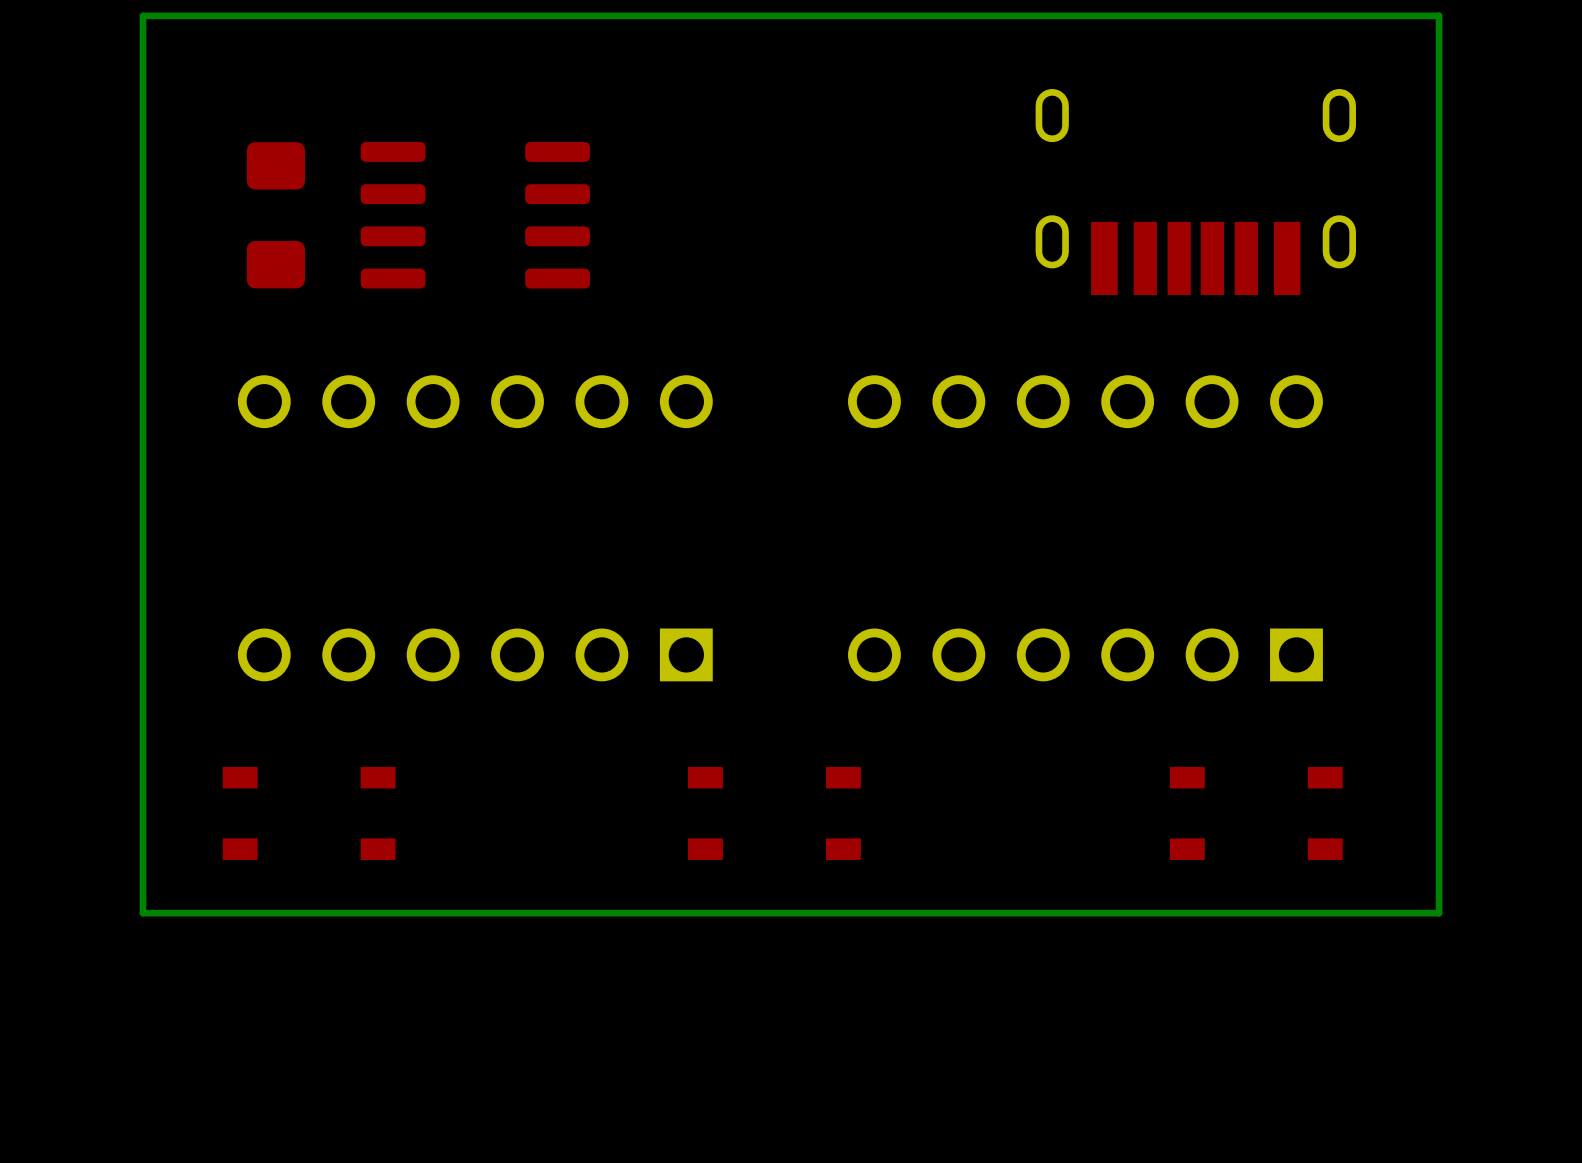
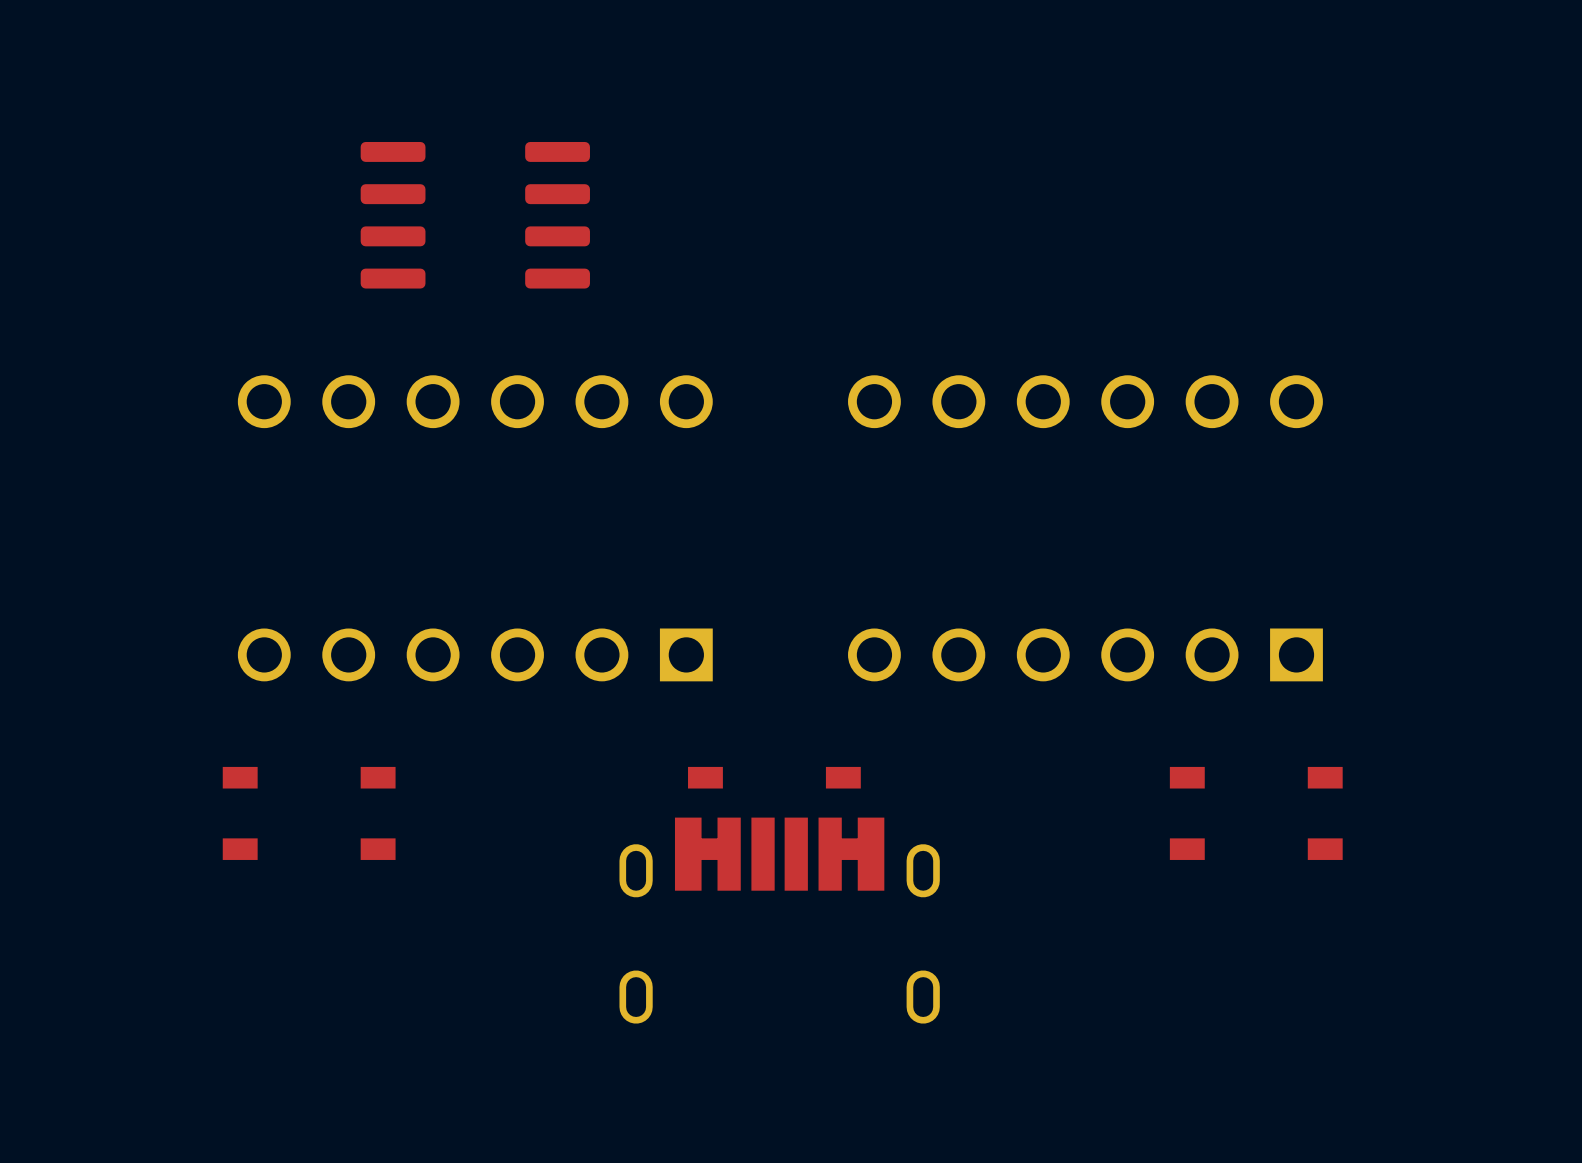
bottom track: (1439, 15) (143, 15) (143, 913) (1439, 913) (1439, 15) -> none
part: (1195, 192) -> none
part: (275, 215) -> none
part: none -> (779, 920)

